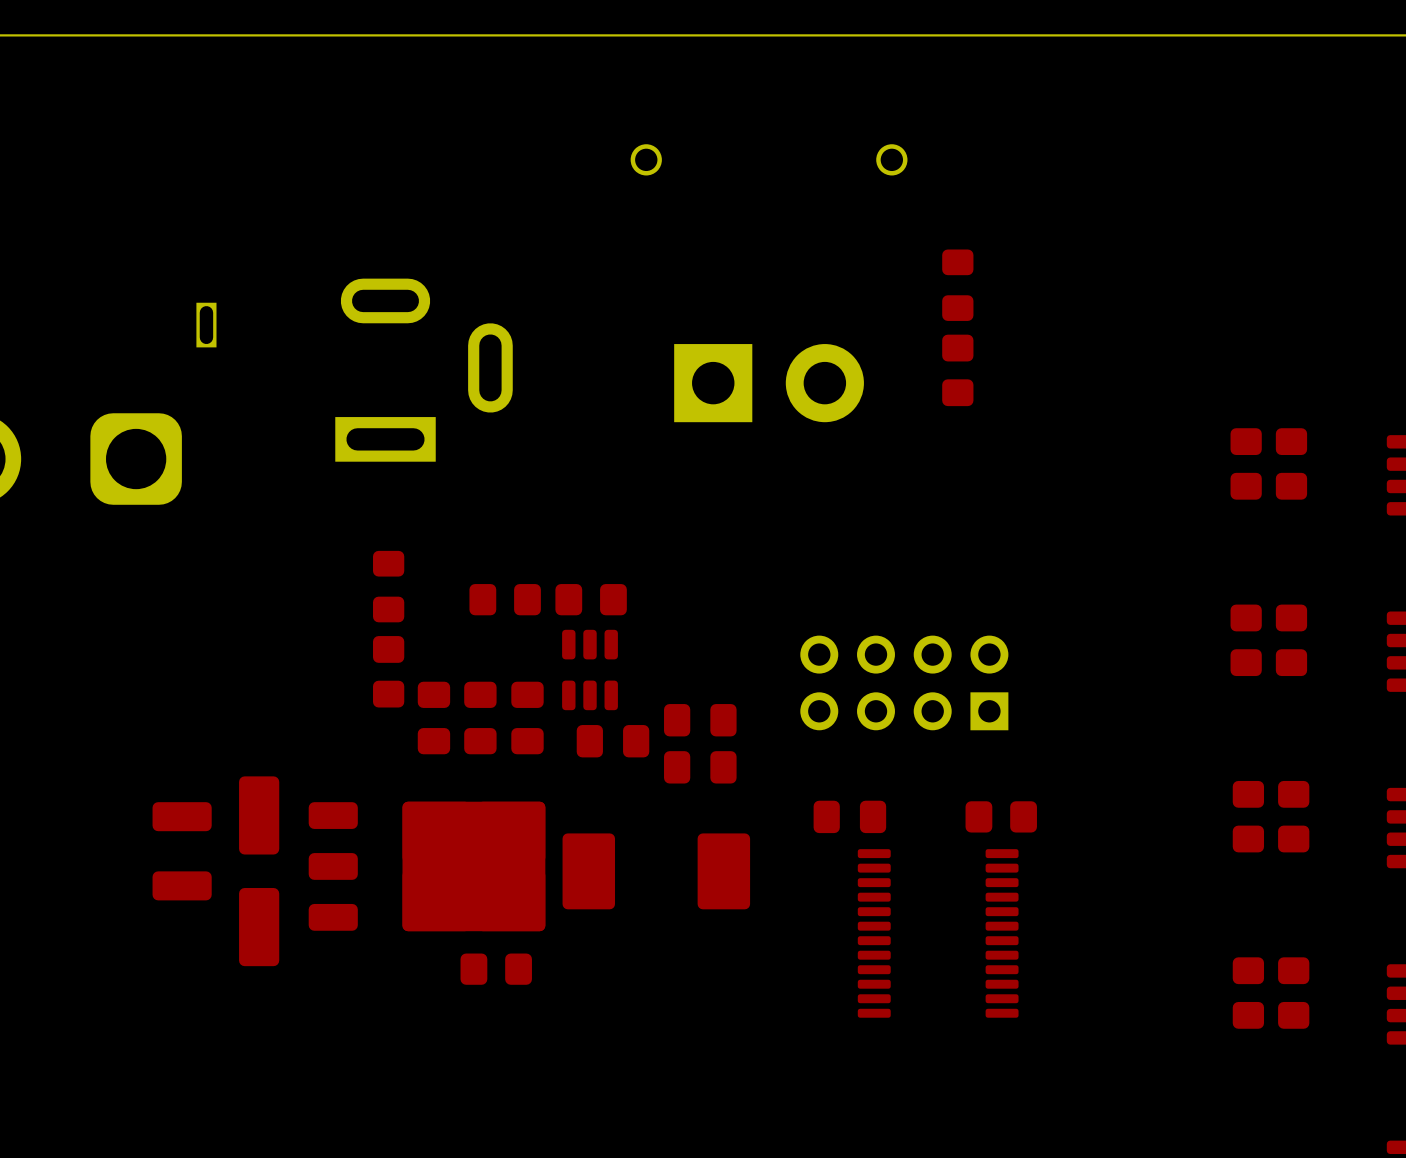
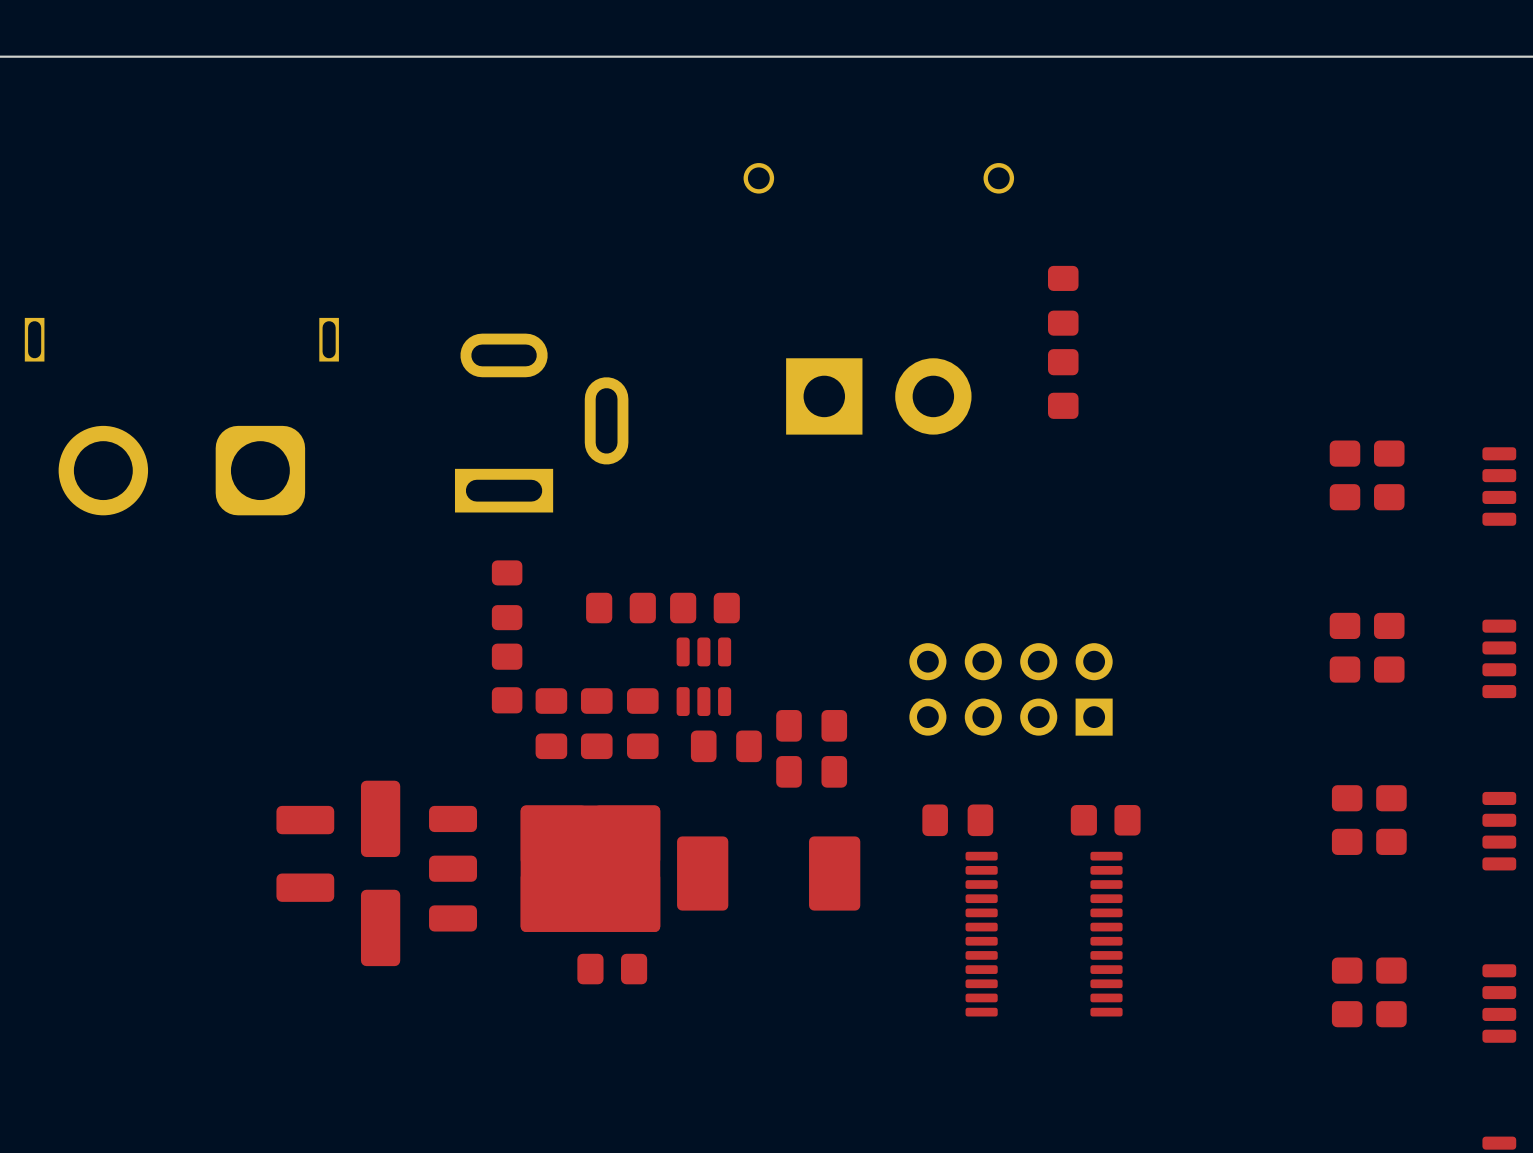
part position: (424, 370) -> (541, 423)

